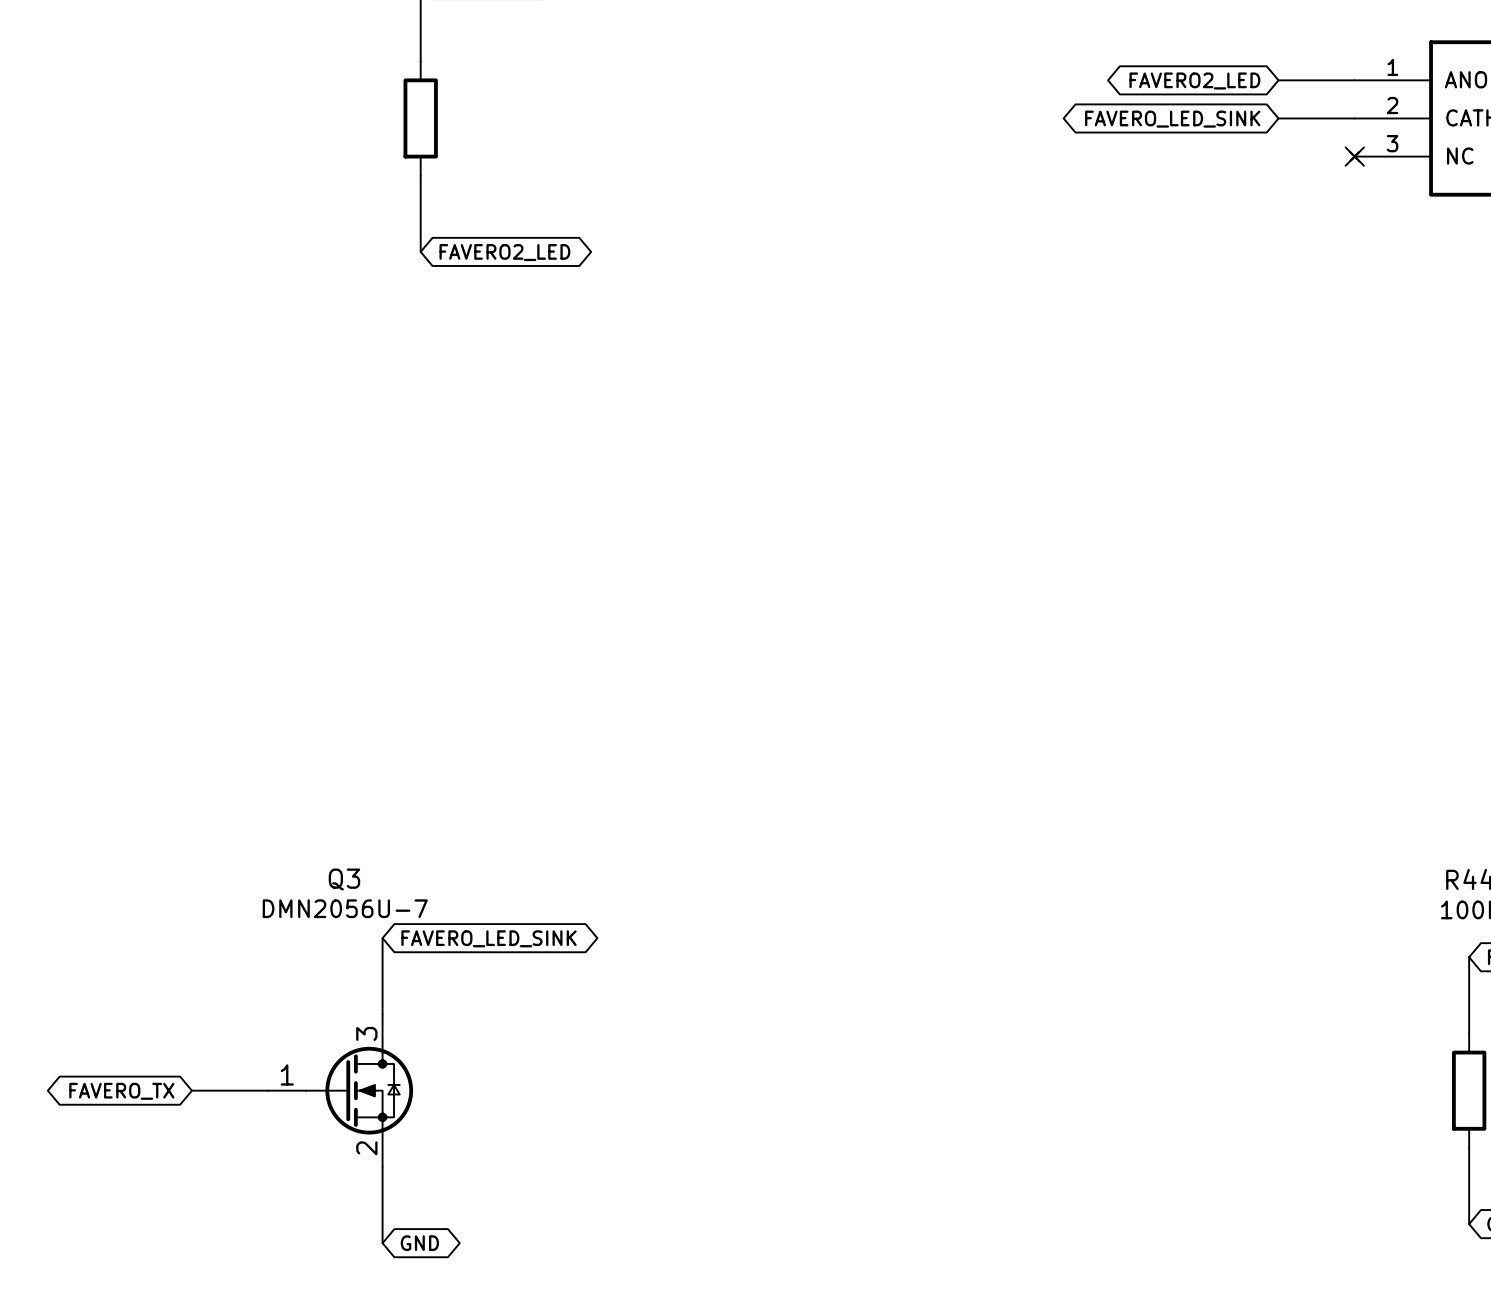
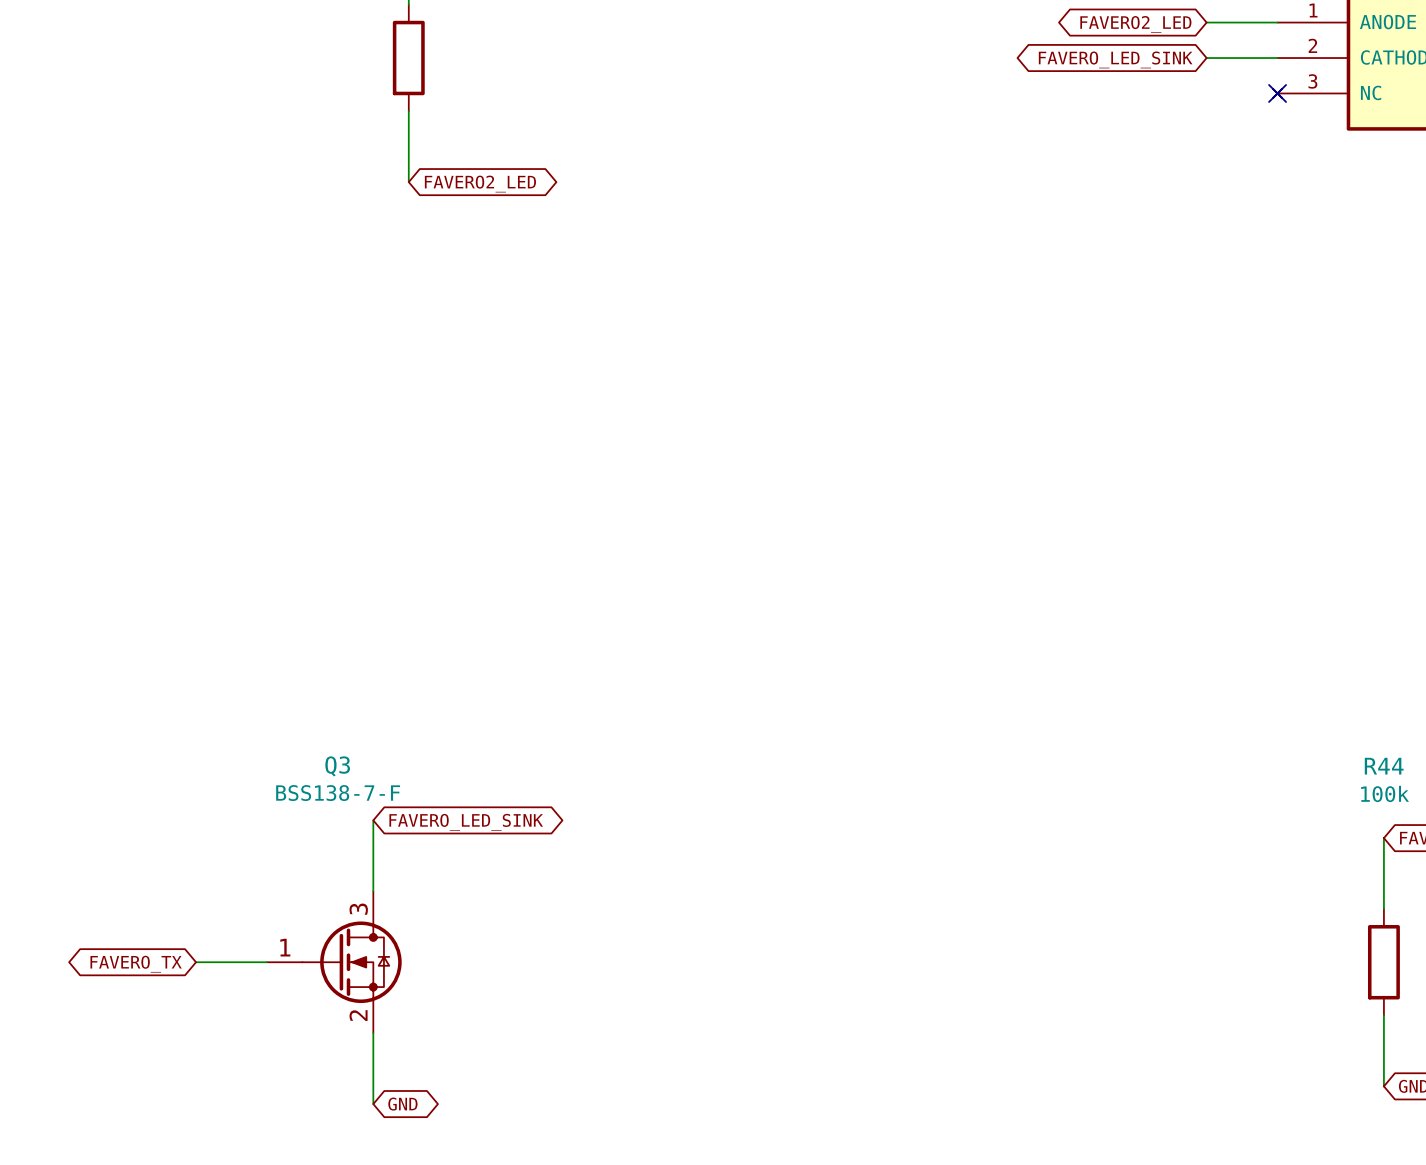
Q3 value: DMN2056U-7 (345, 908) -> BSS138-7-F (338, 793)

